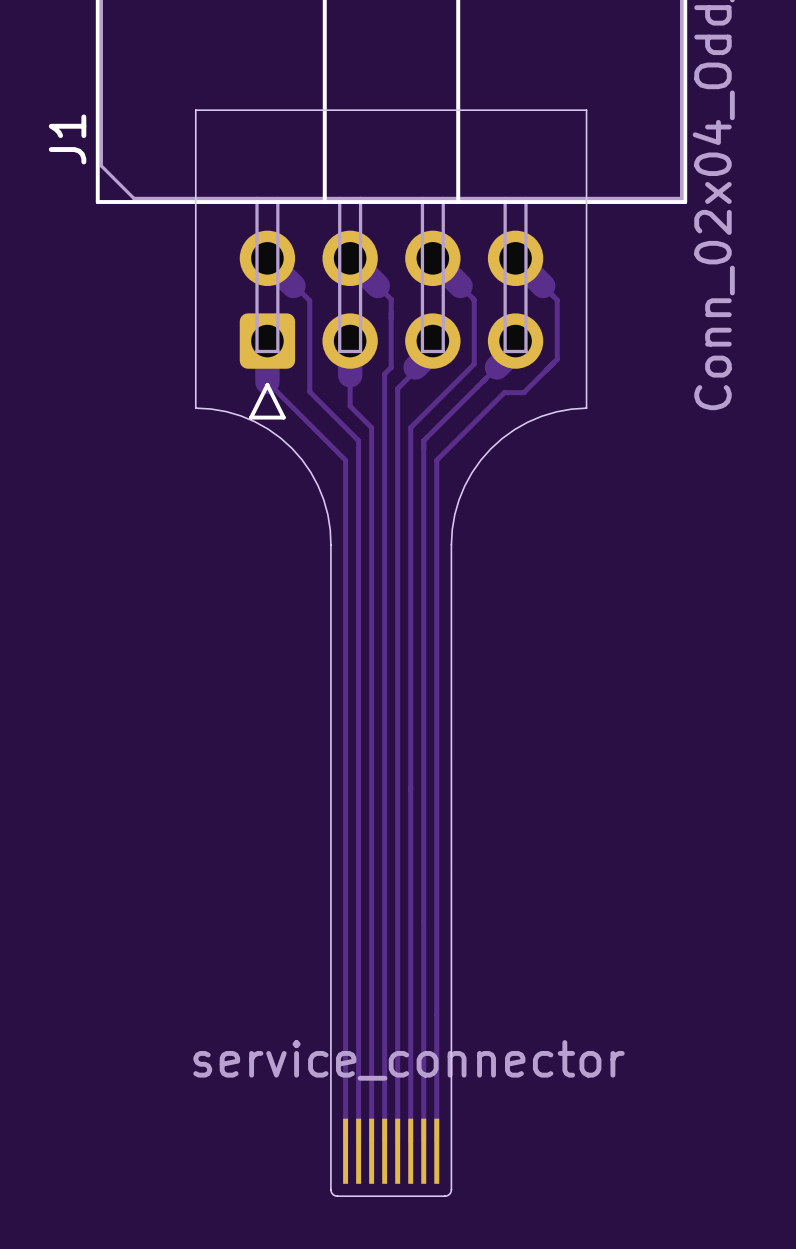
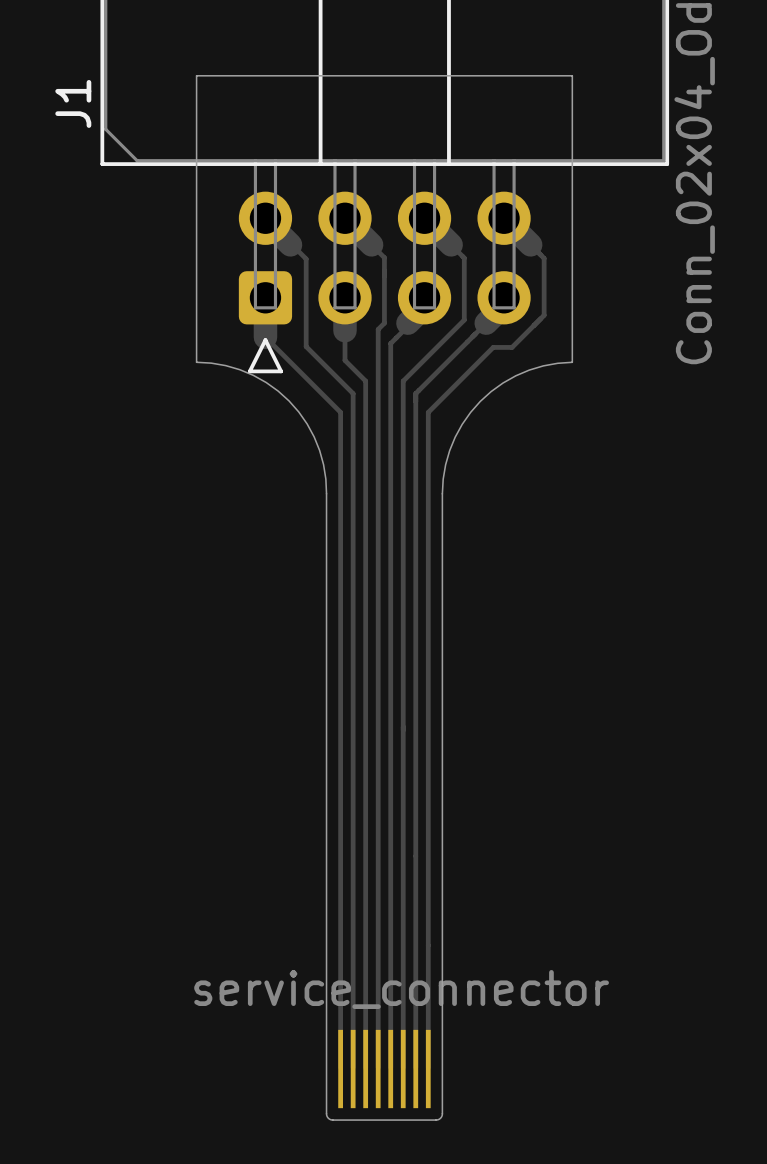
part footprint: [343, 1118, 440, 1184] -> [338, 1029, 431, 1109]

